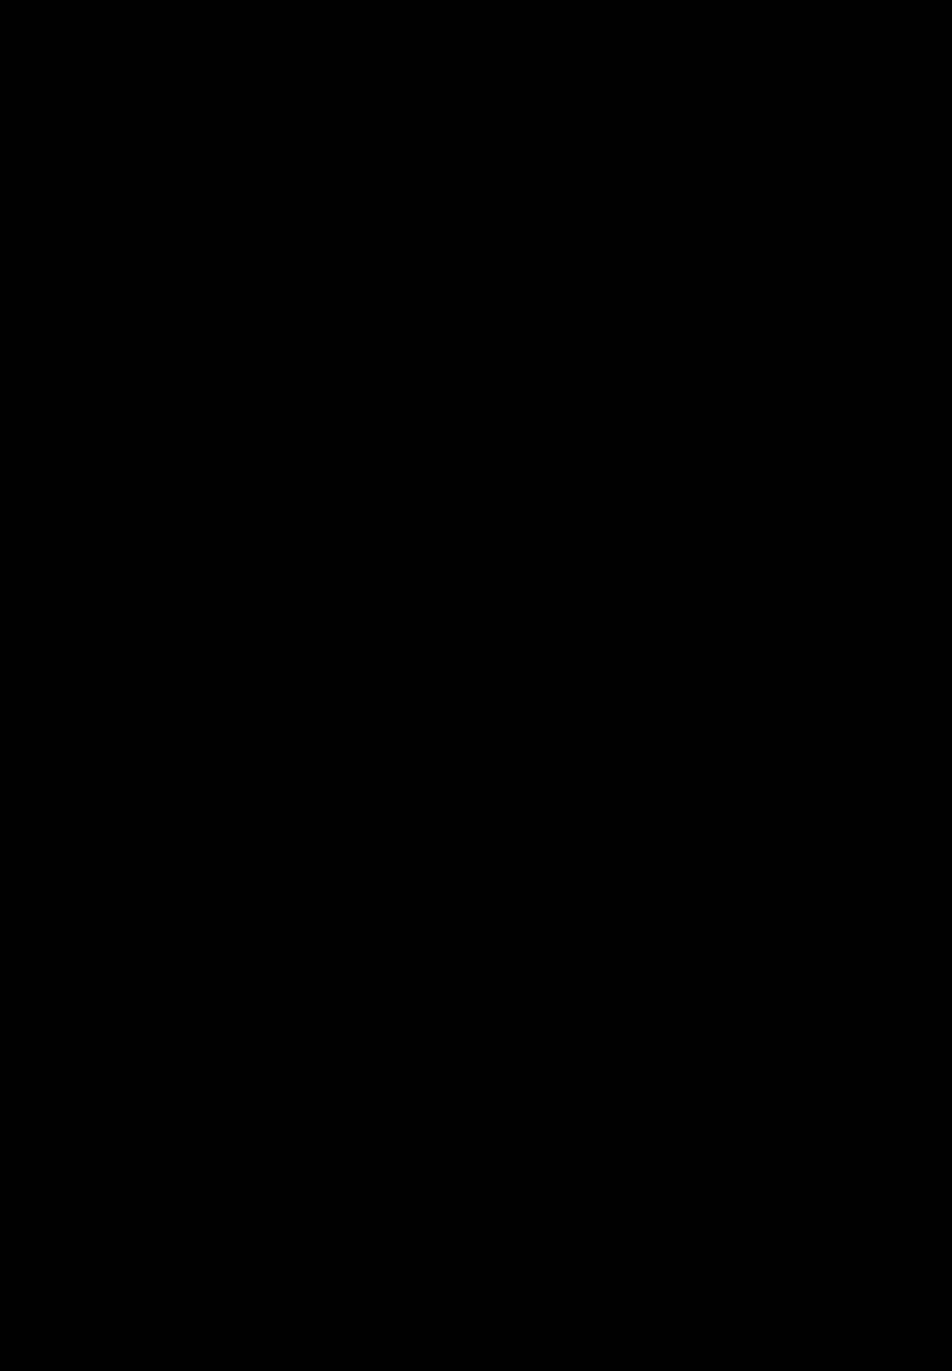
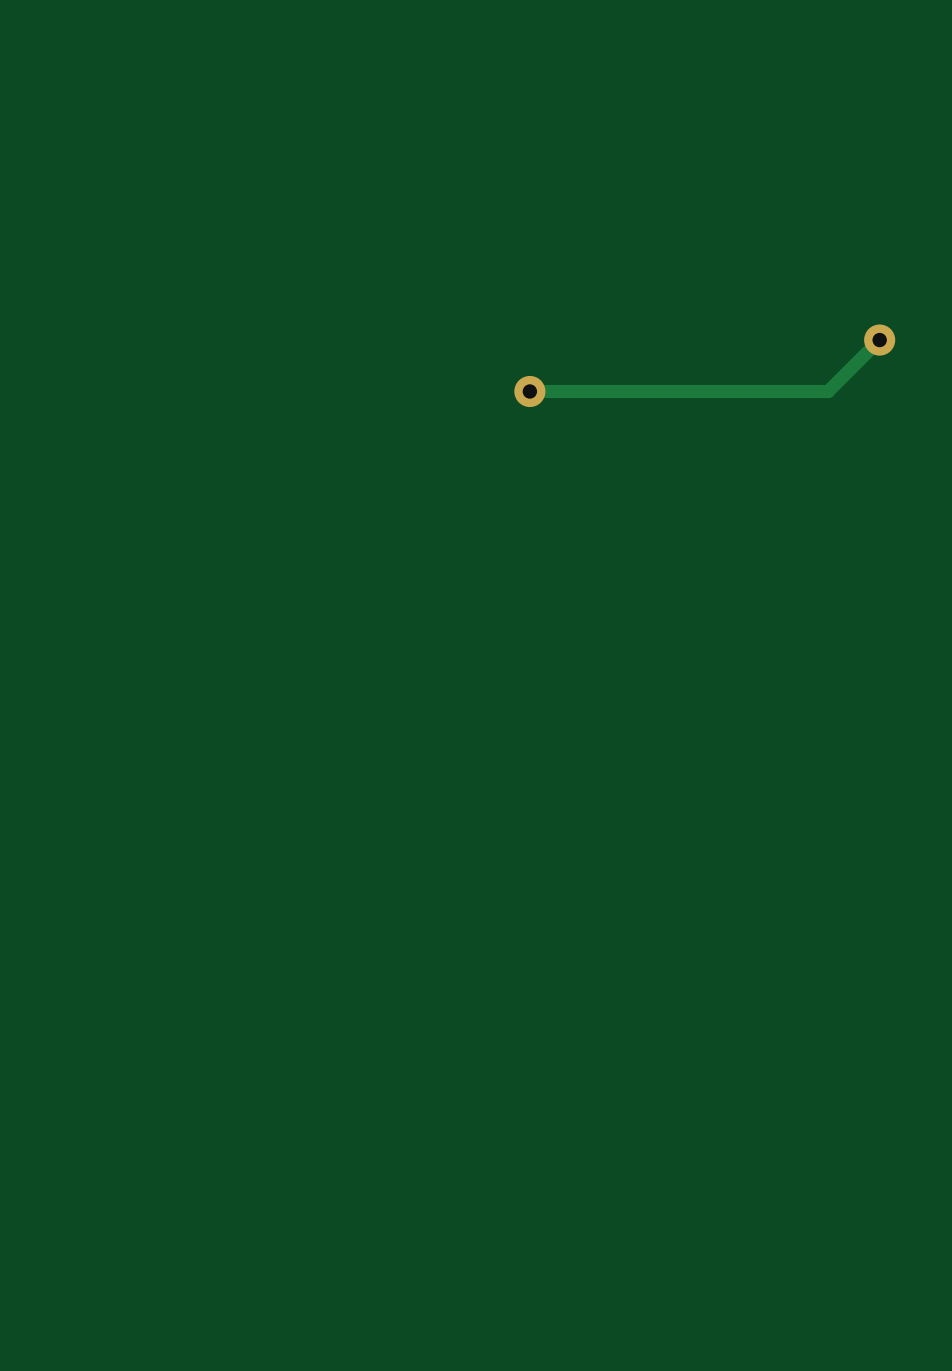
track: none -> (879, 340) (828, 391) (529, 391)
via: none -> (879, 340)
via: none -> (529, 391)

